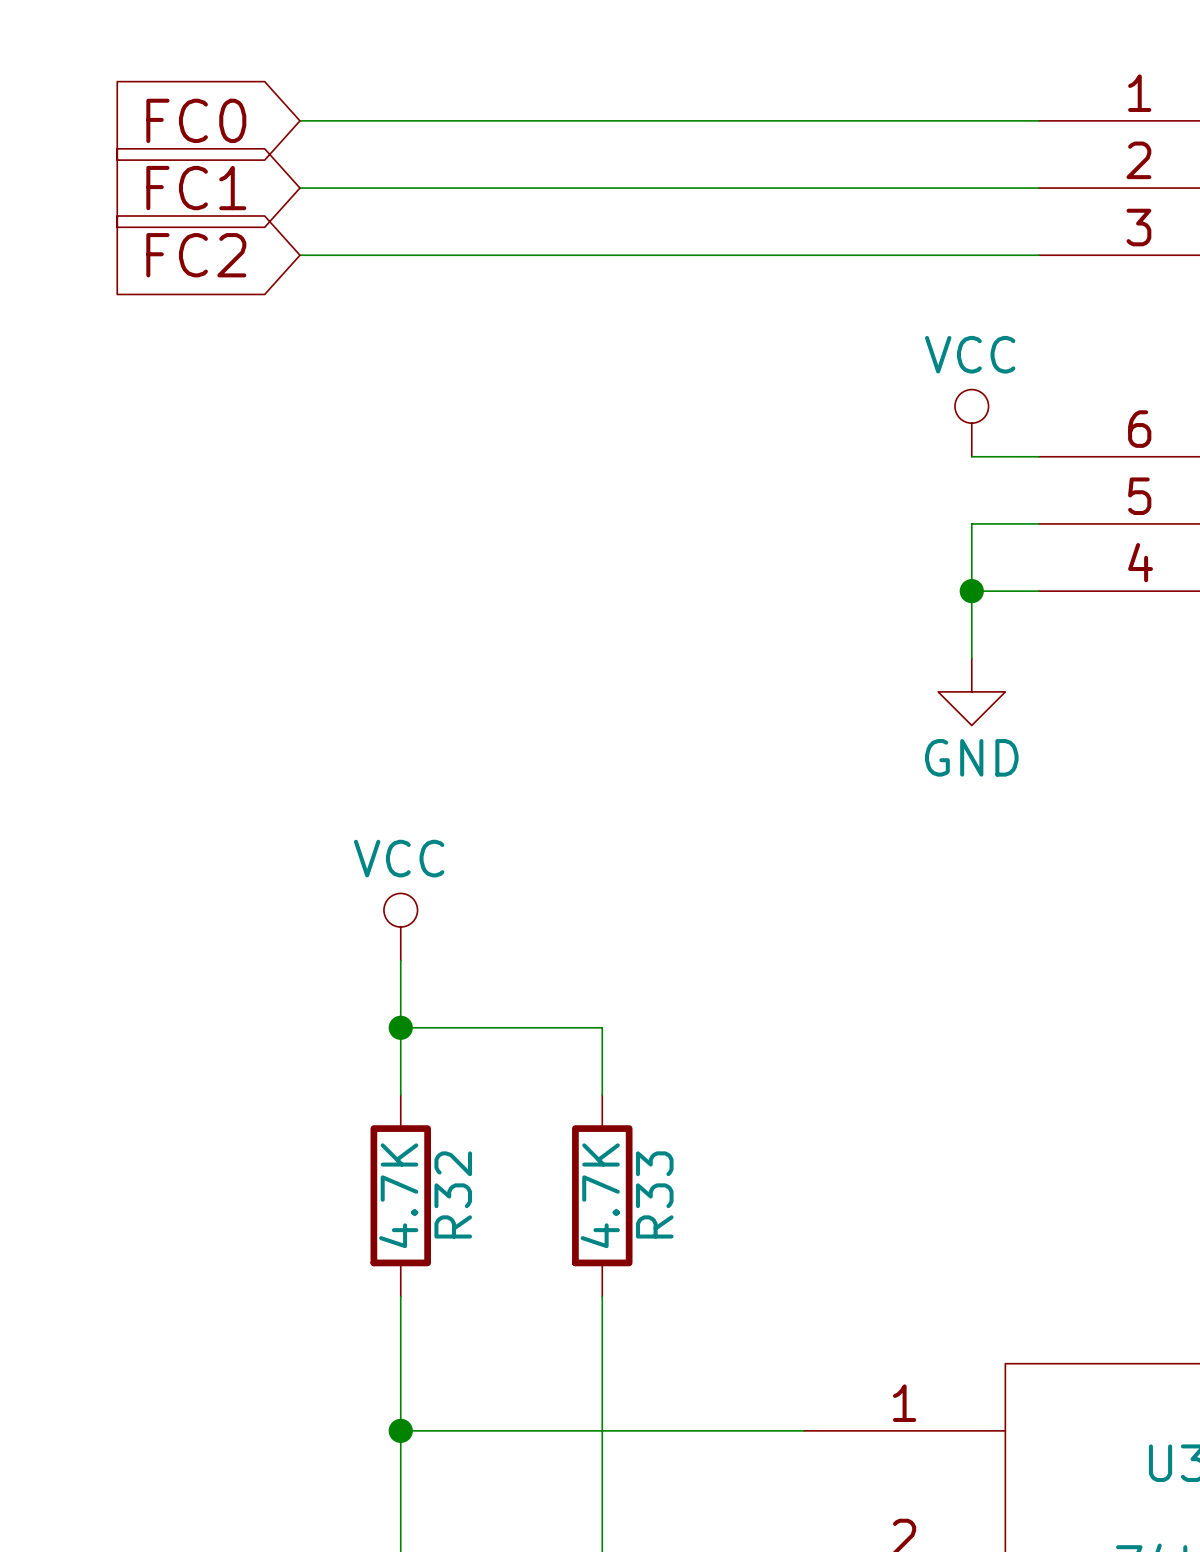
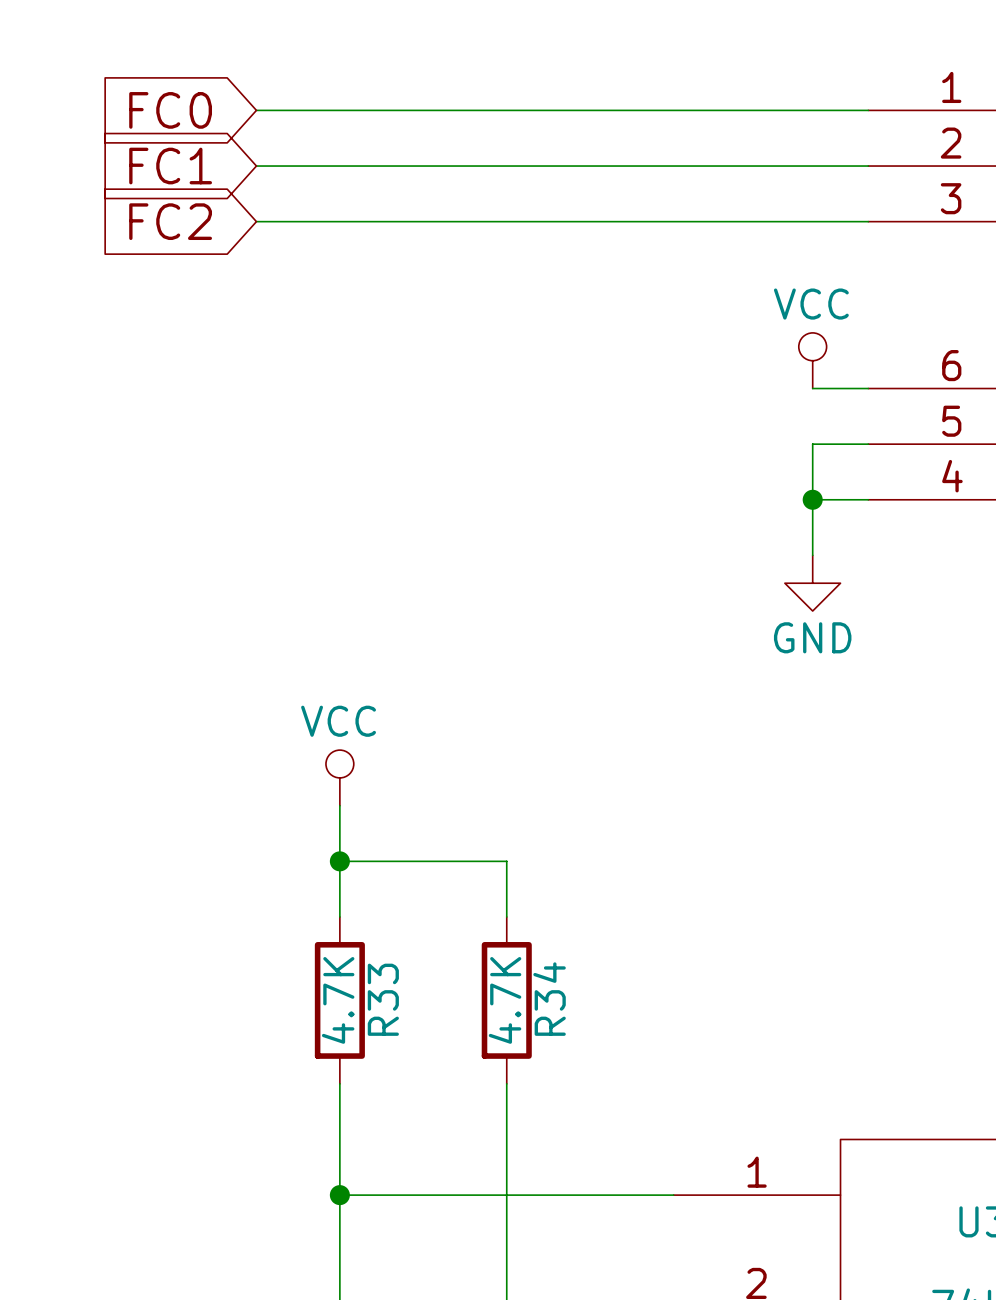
R32 name: R32 (453, 1194) -> R33 (383, 999)
R33 name: R33 (654, 1194) -> R34 (549, 999)

